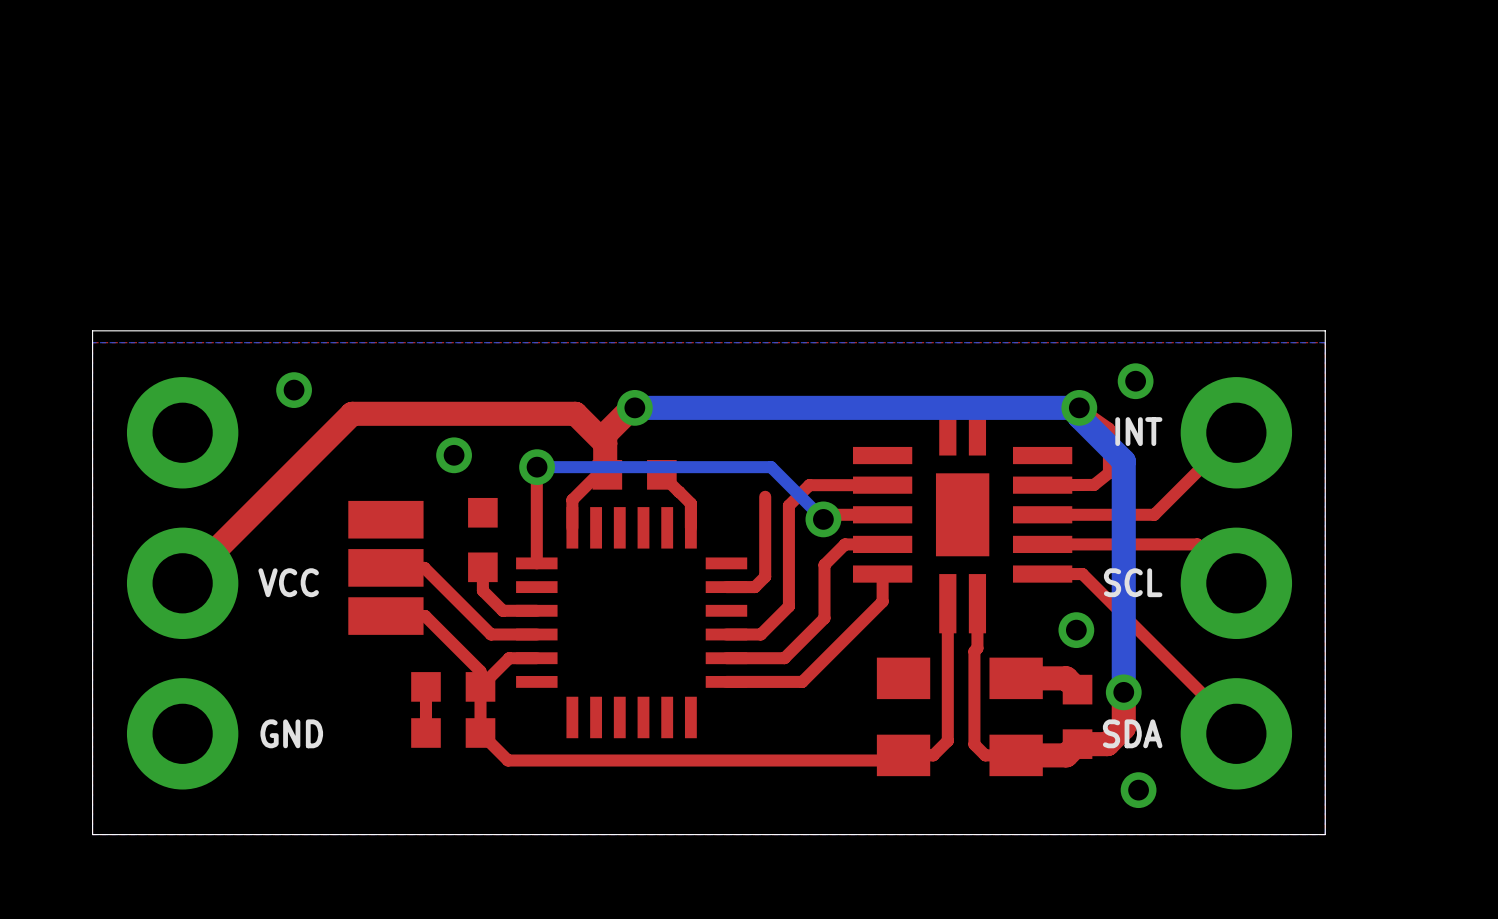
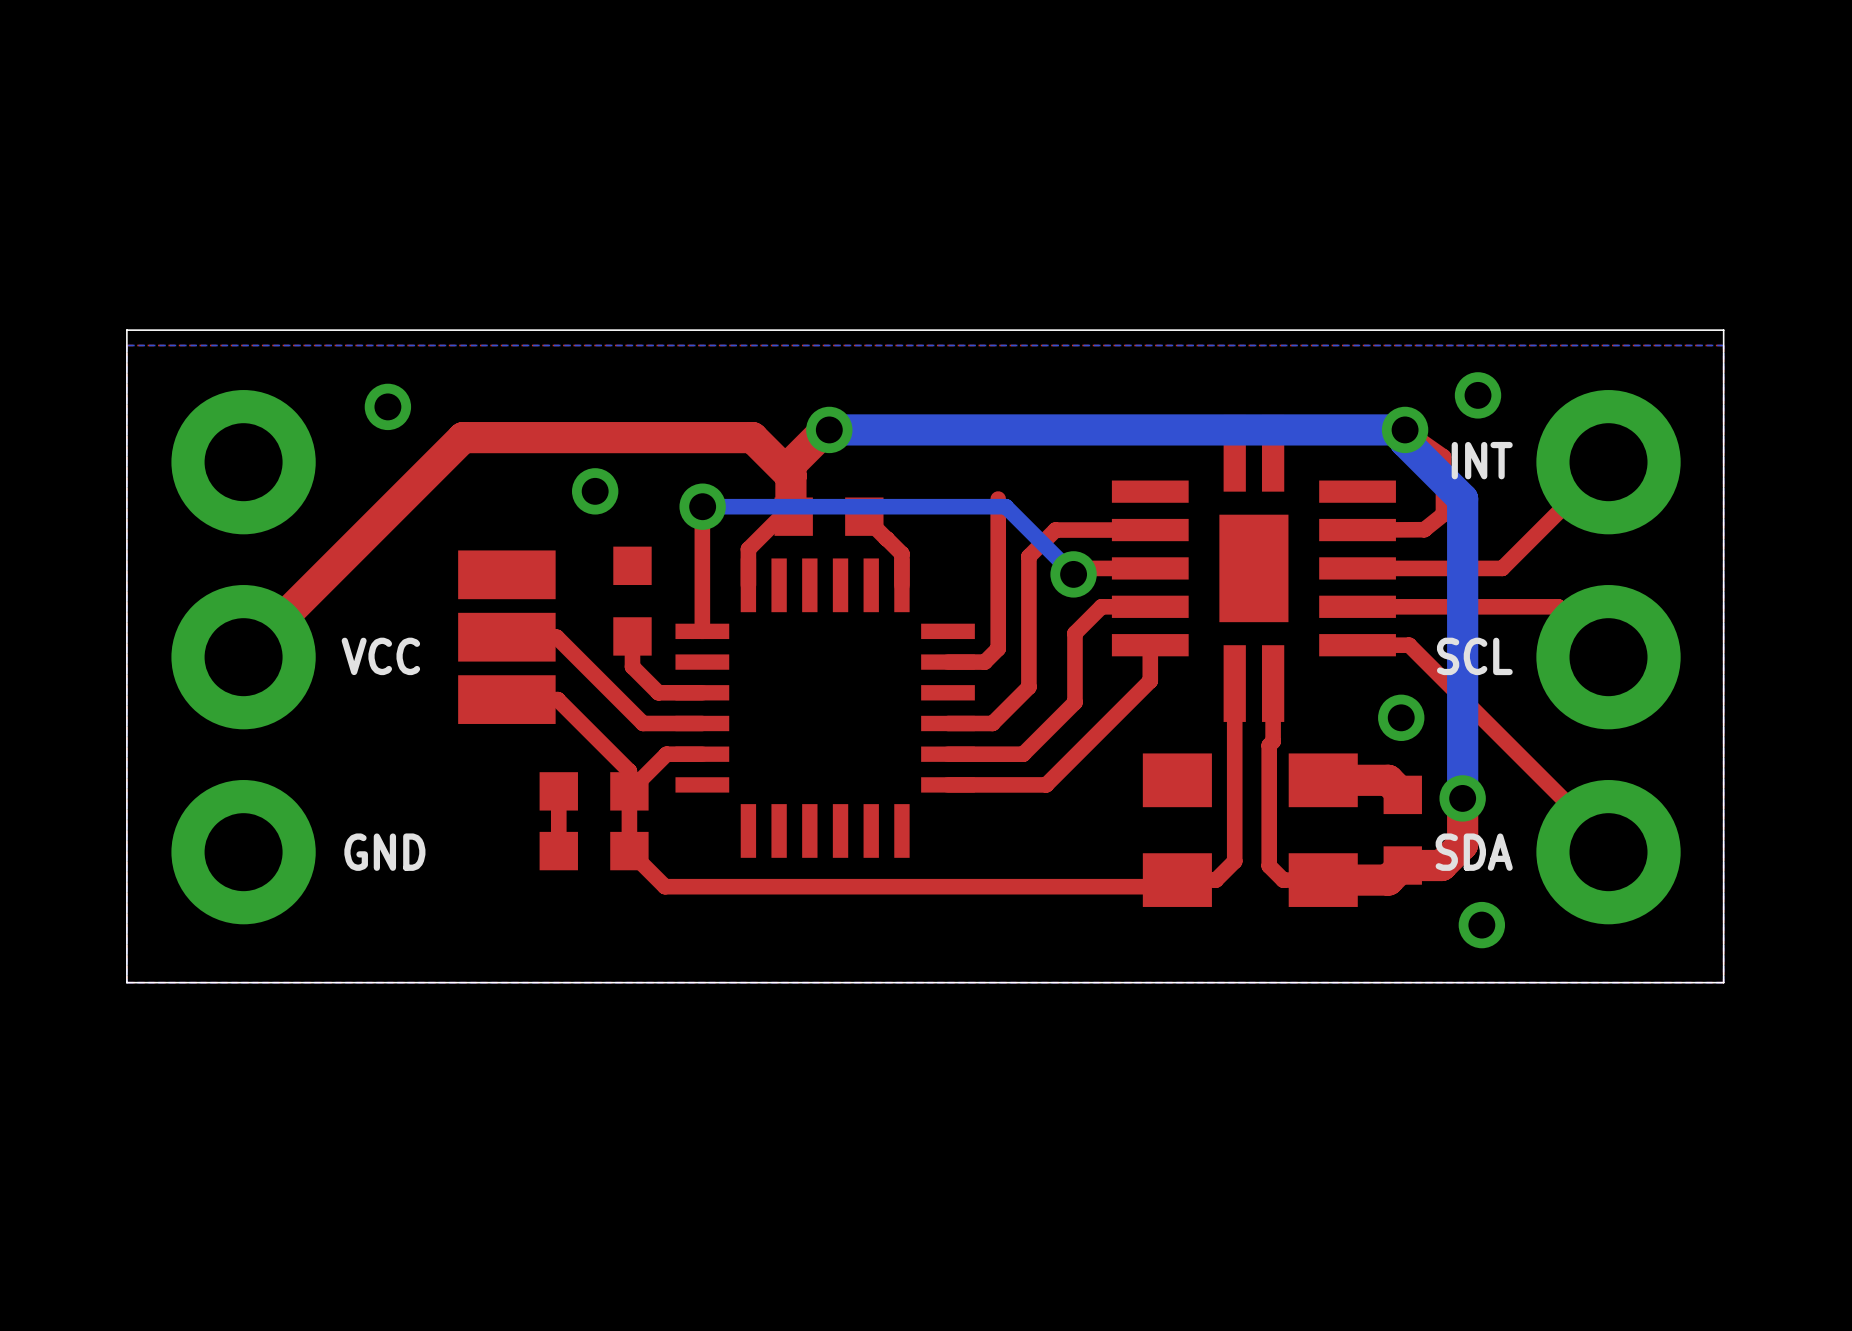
top track: none -> (998, 499) (998, 545)

